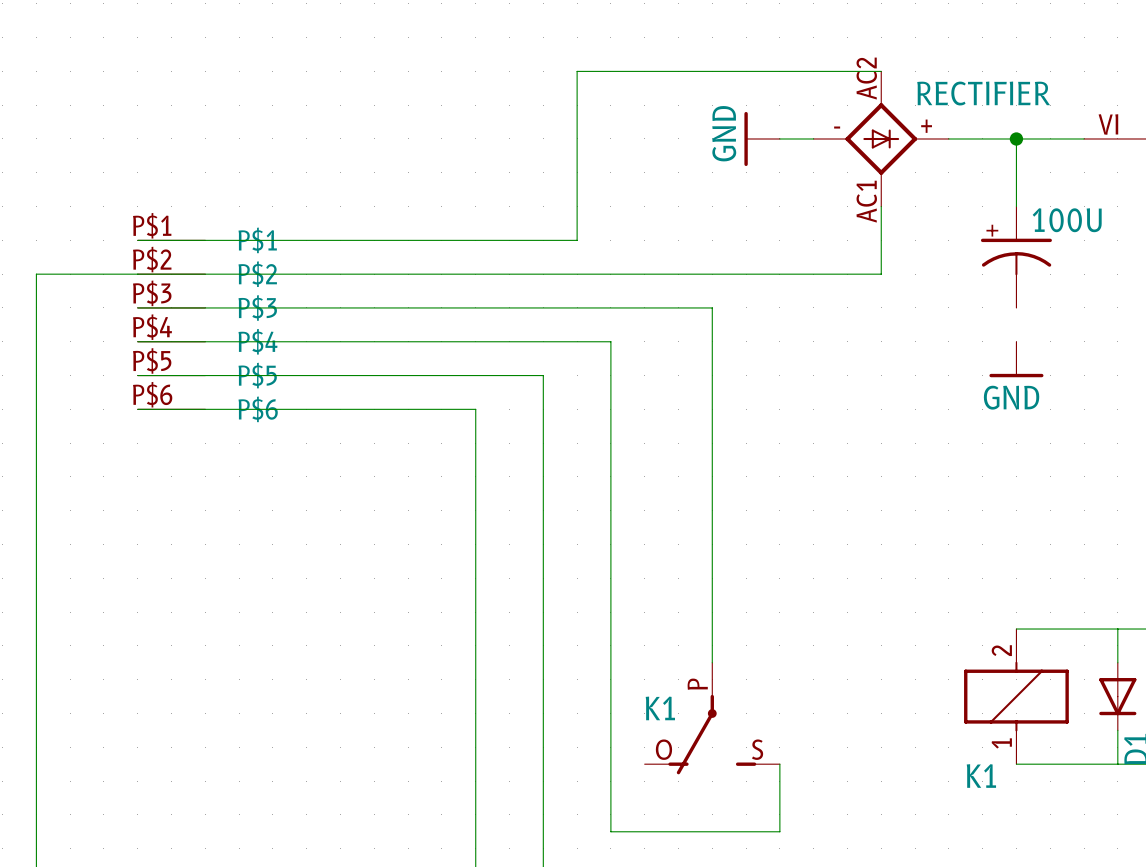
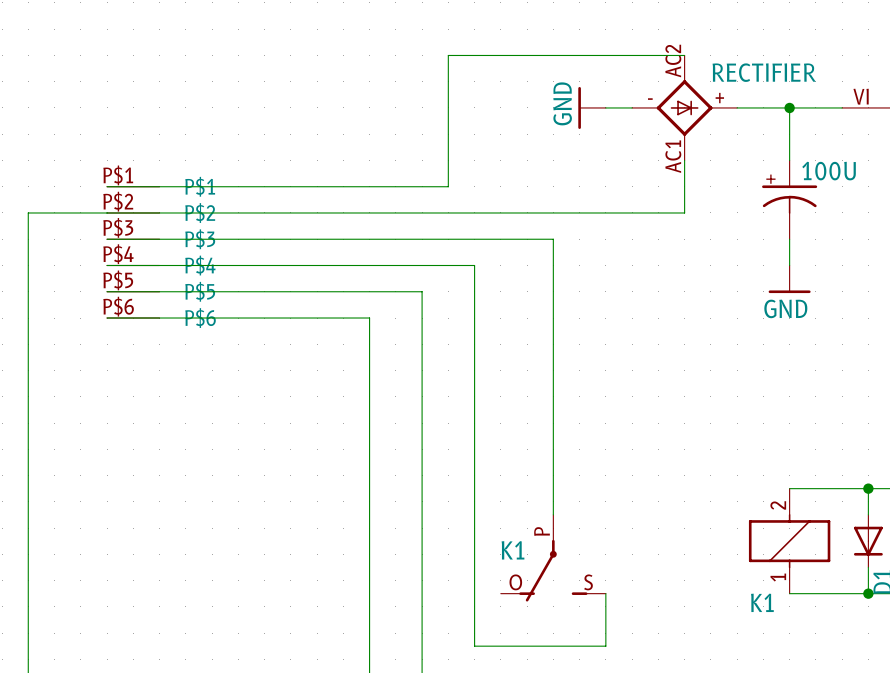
wire: none -> (789, 239) (789, 265)
junction: none -> (868, 488)
junction: none -> (868, 593)

